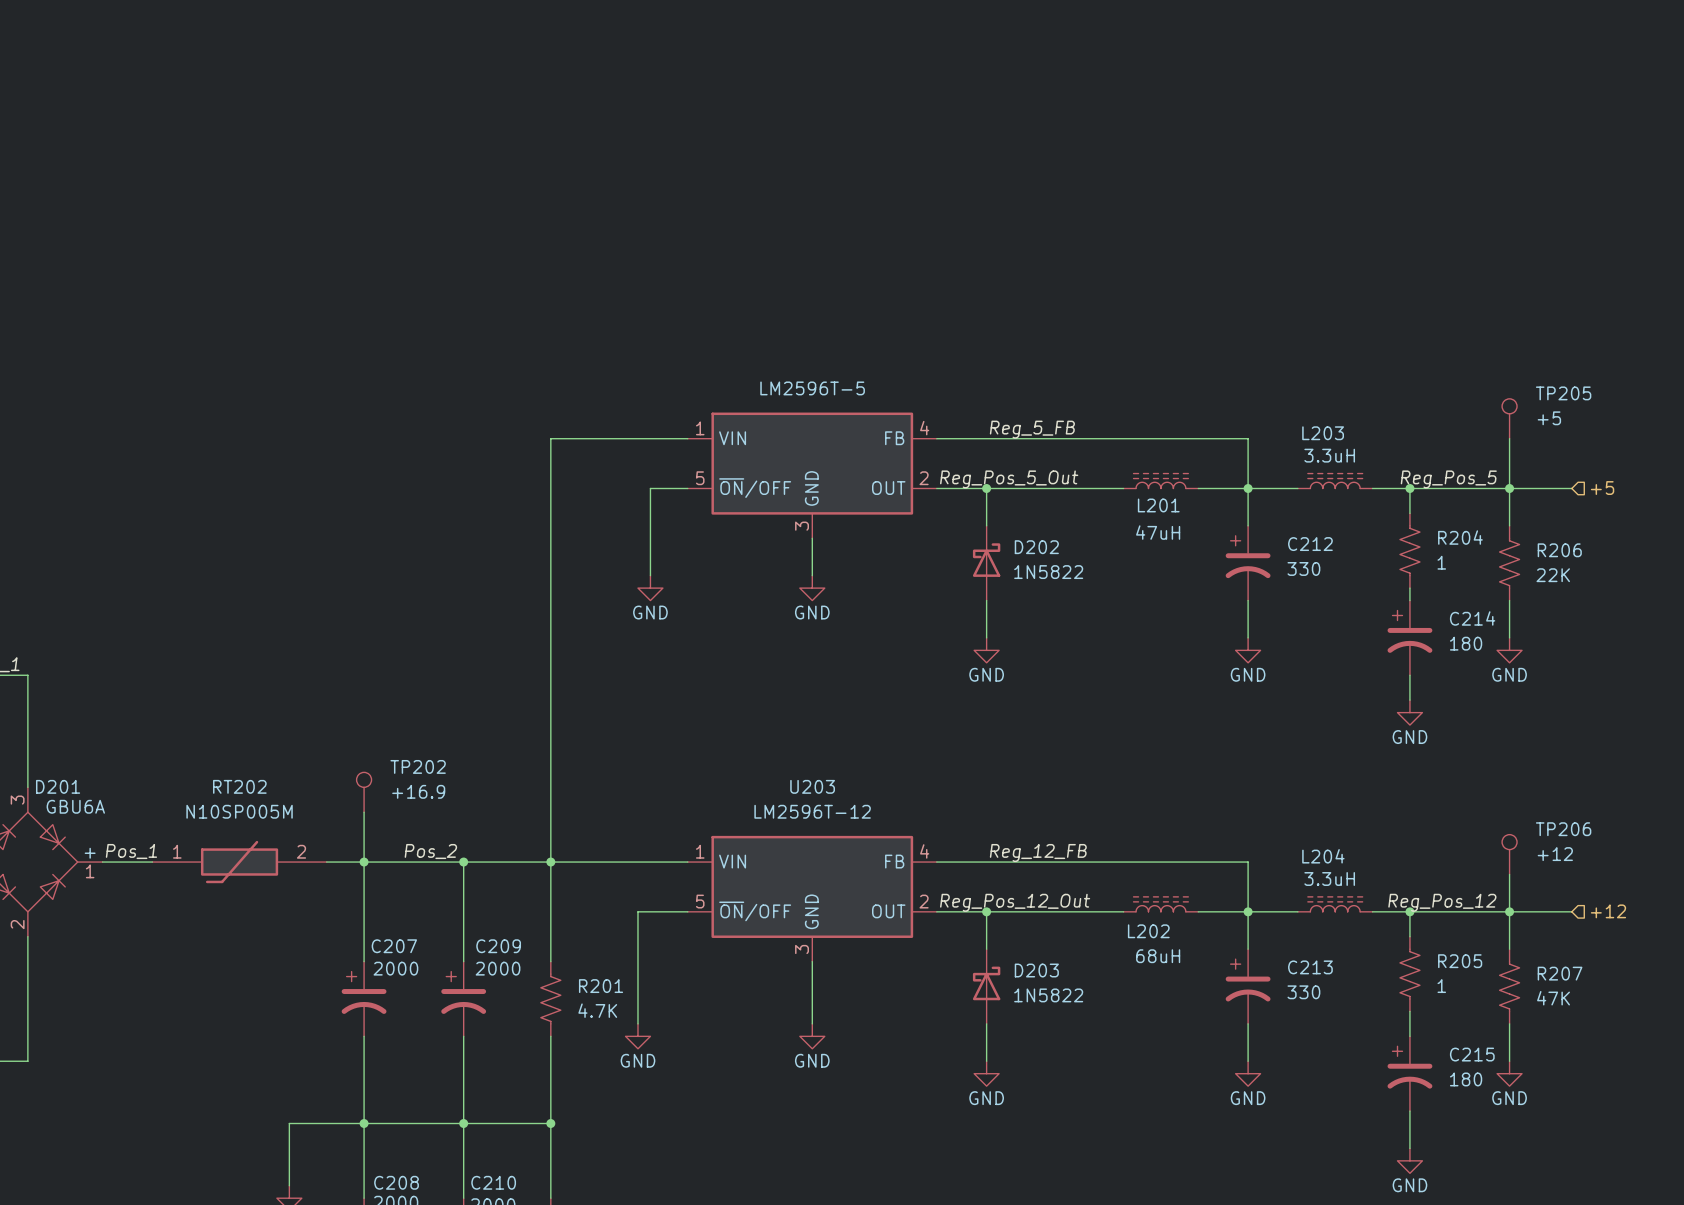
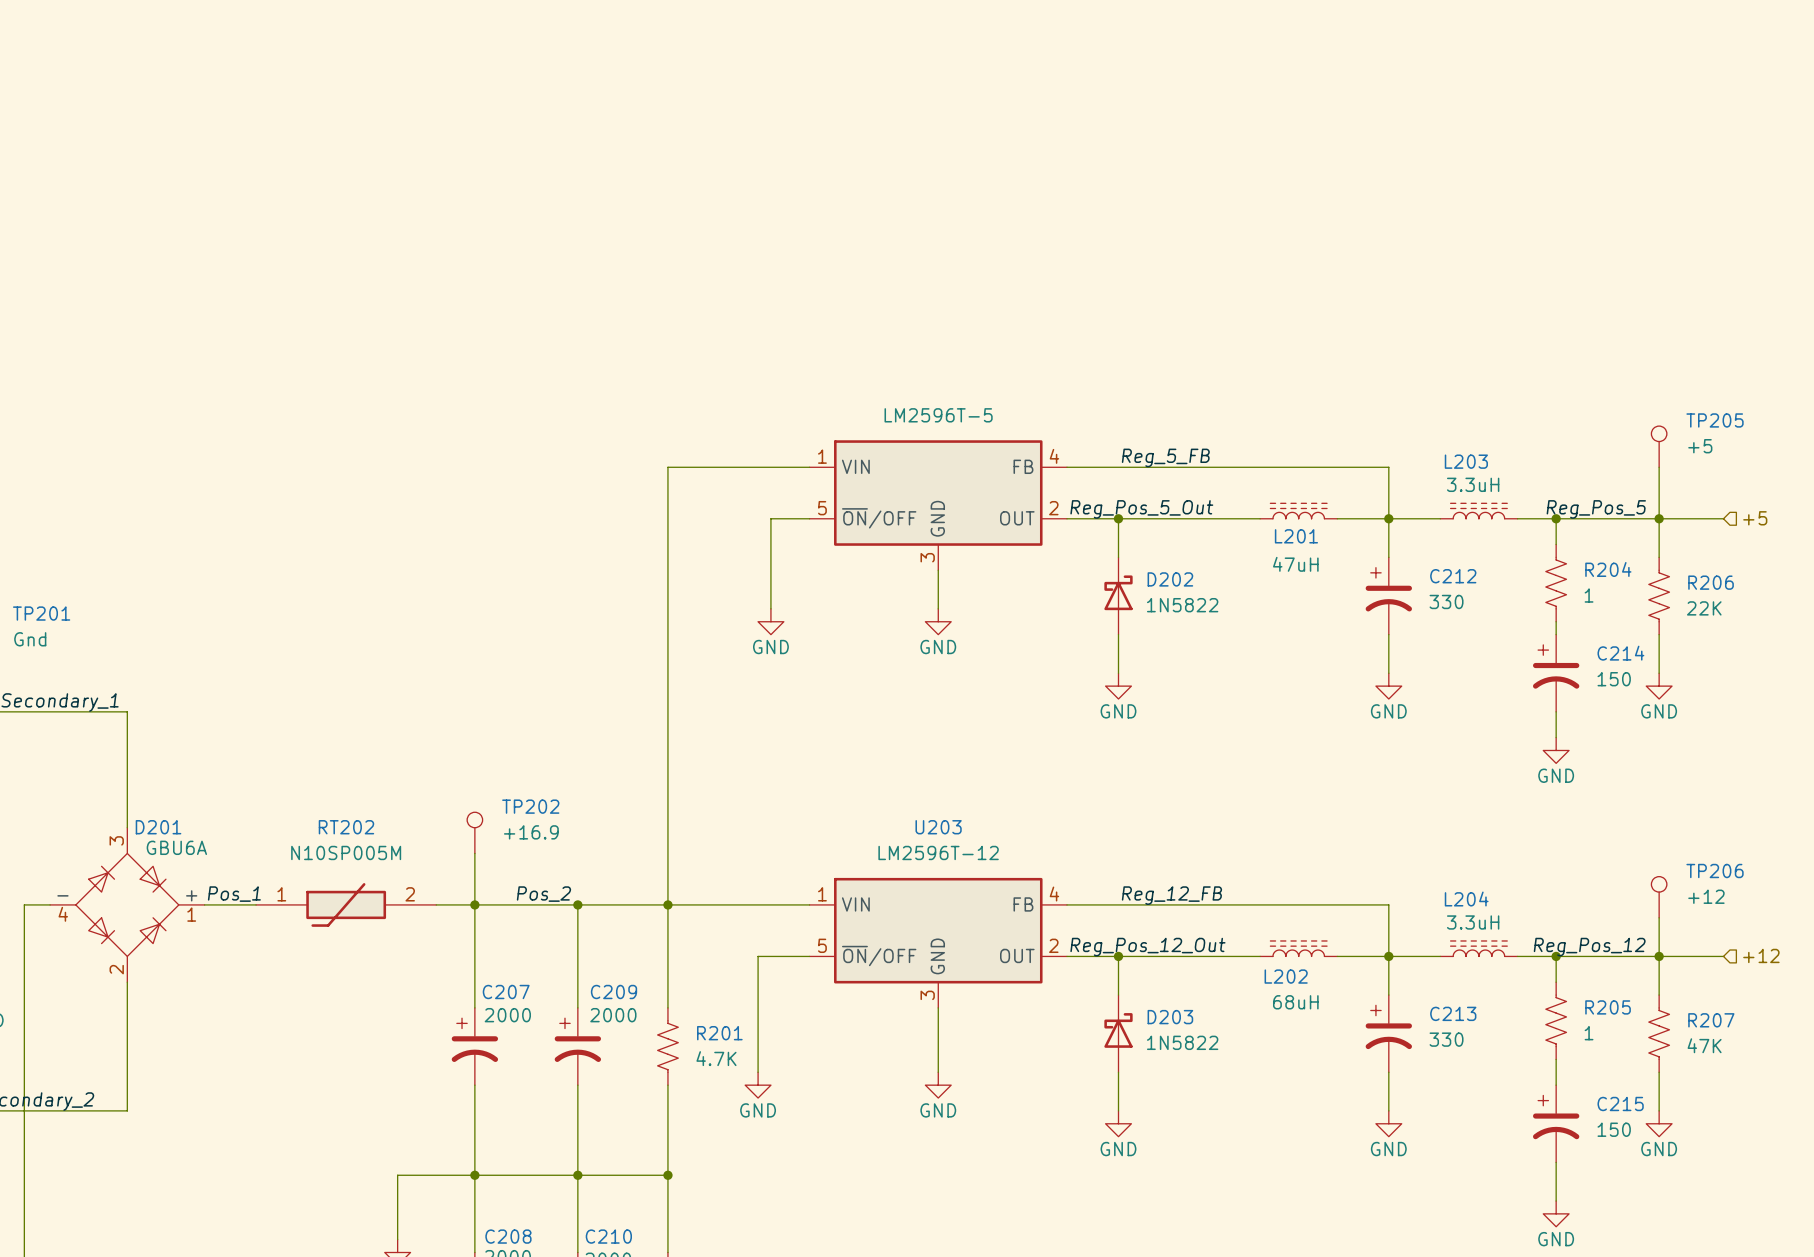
C214 value: 180 (1466, 643) -> 150 (1614, 679)
C215 value: 180 (1466, 1079) -> 150 (1614, 1129)

